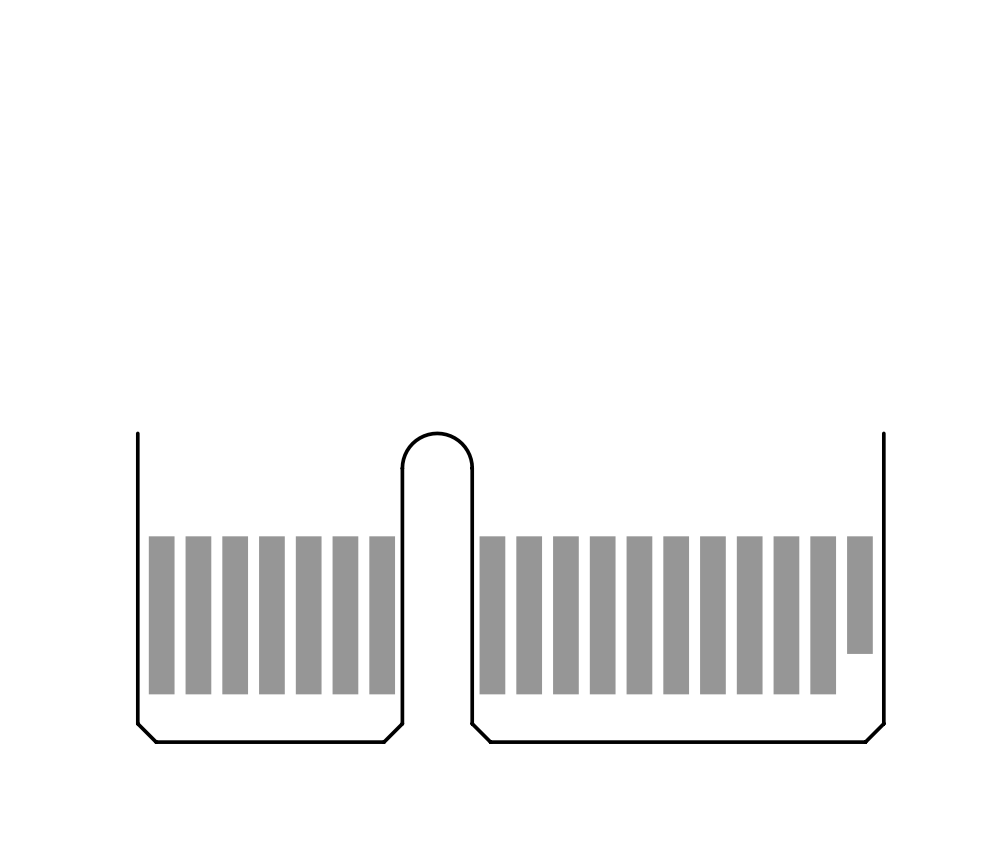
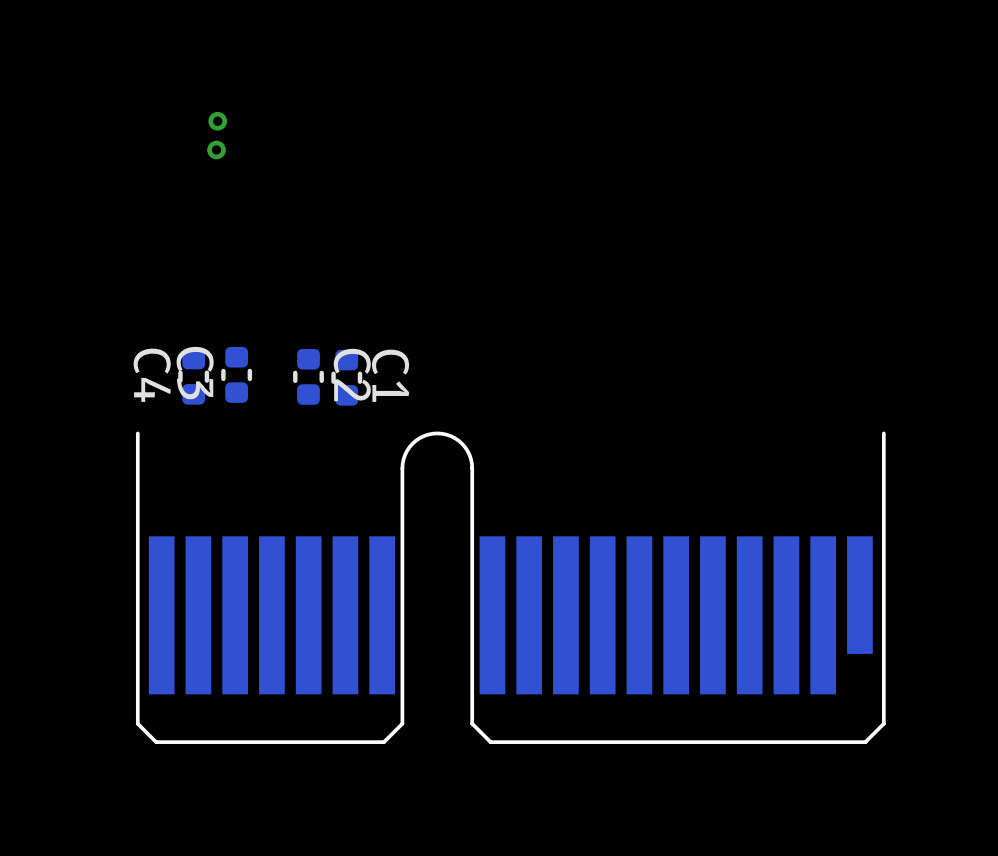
via: none -> (217, 121)
via: none -> (216, 149)
C3: none -> (236, 374)
C4: none -> (193, 376)
C2: none -> (308, 376)
C1: none -> (346, 377)

